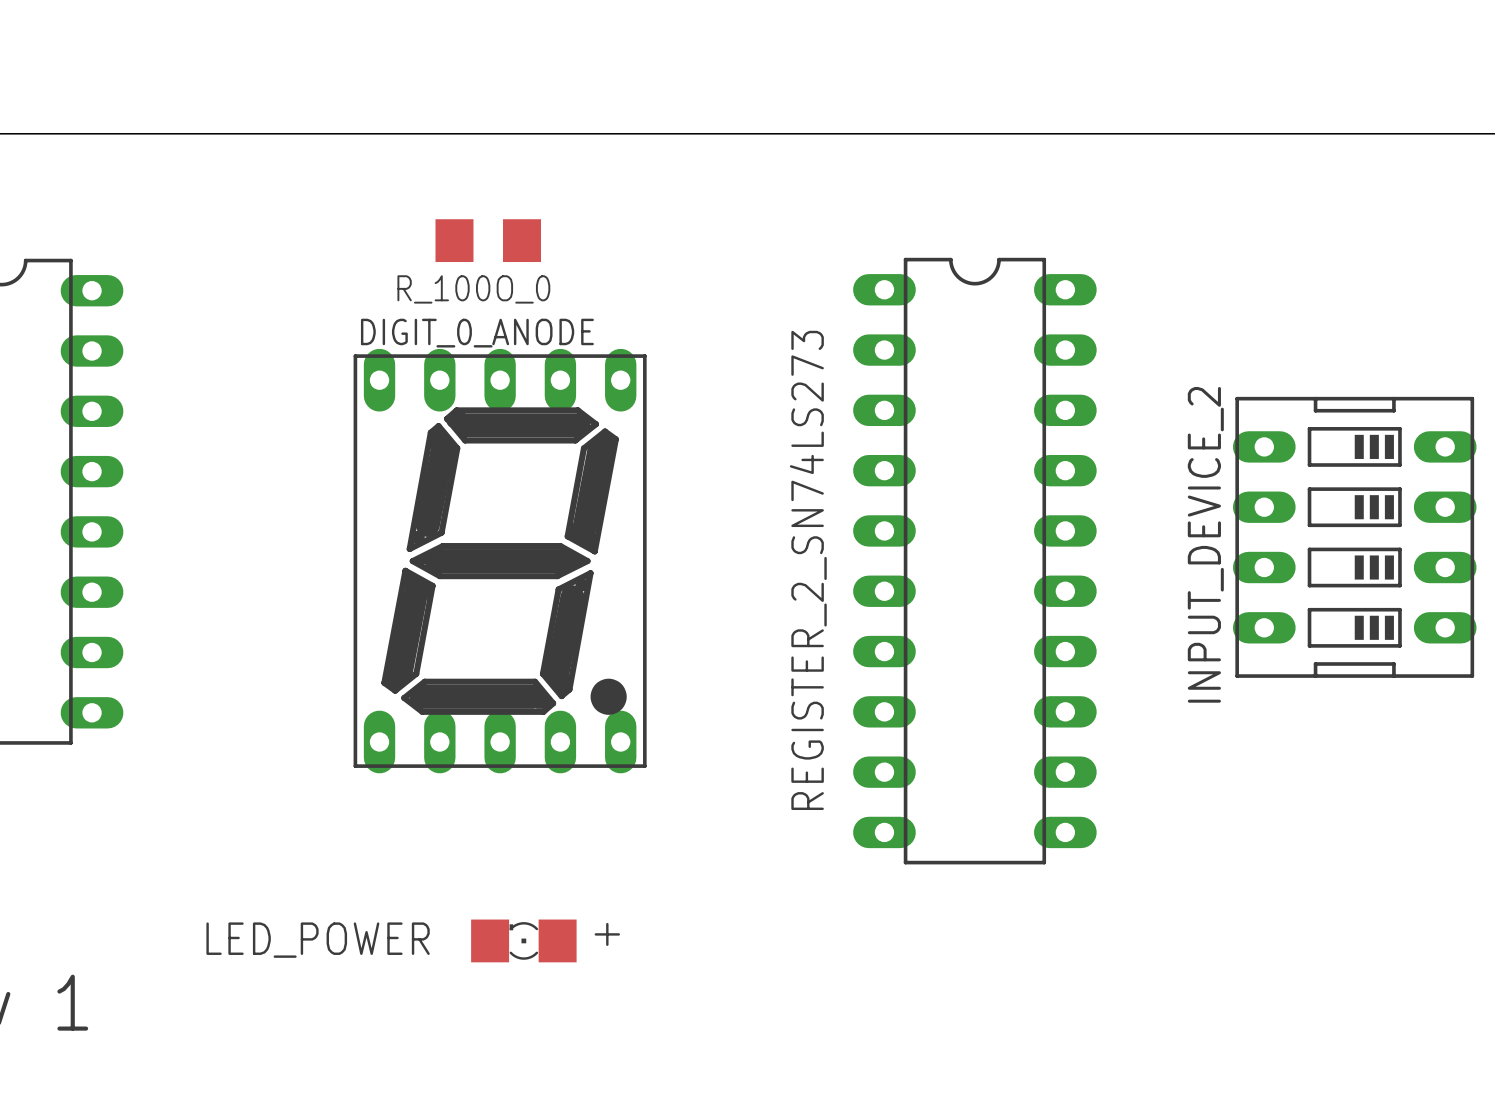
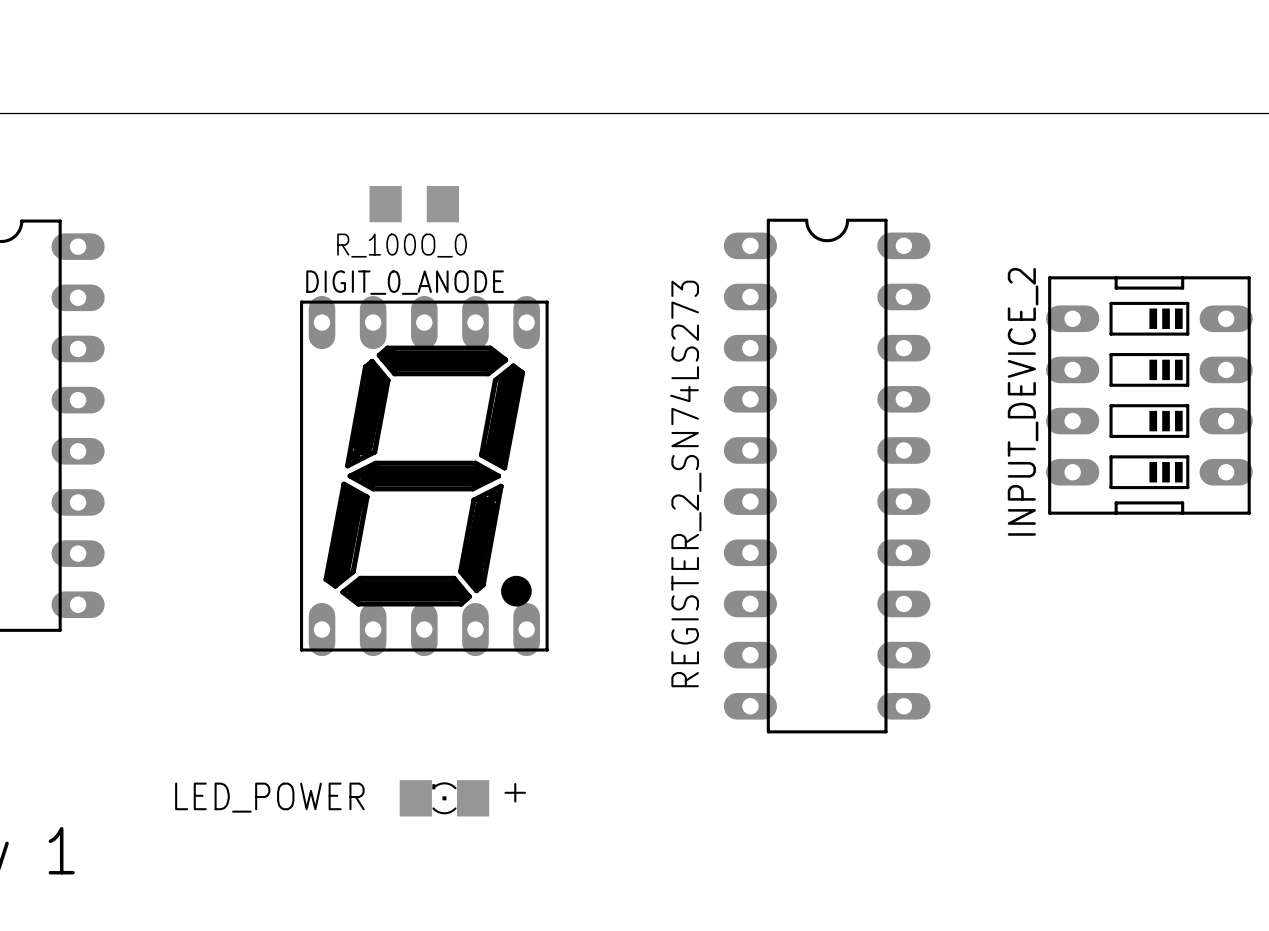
INPUT_DEVICE_2 position: (1354, 537) -> (1149, 395)

